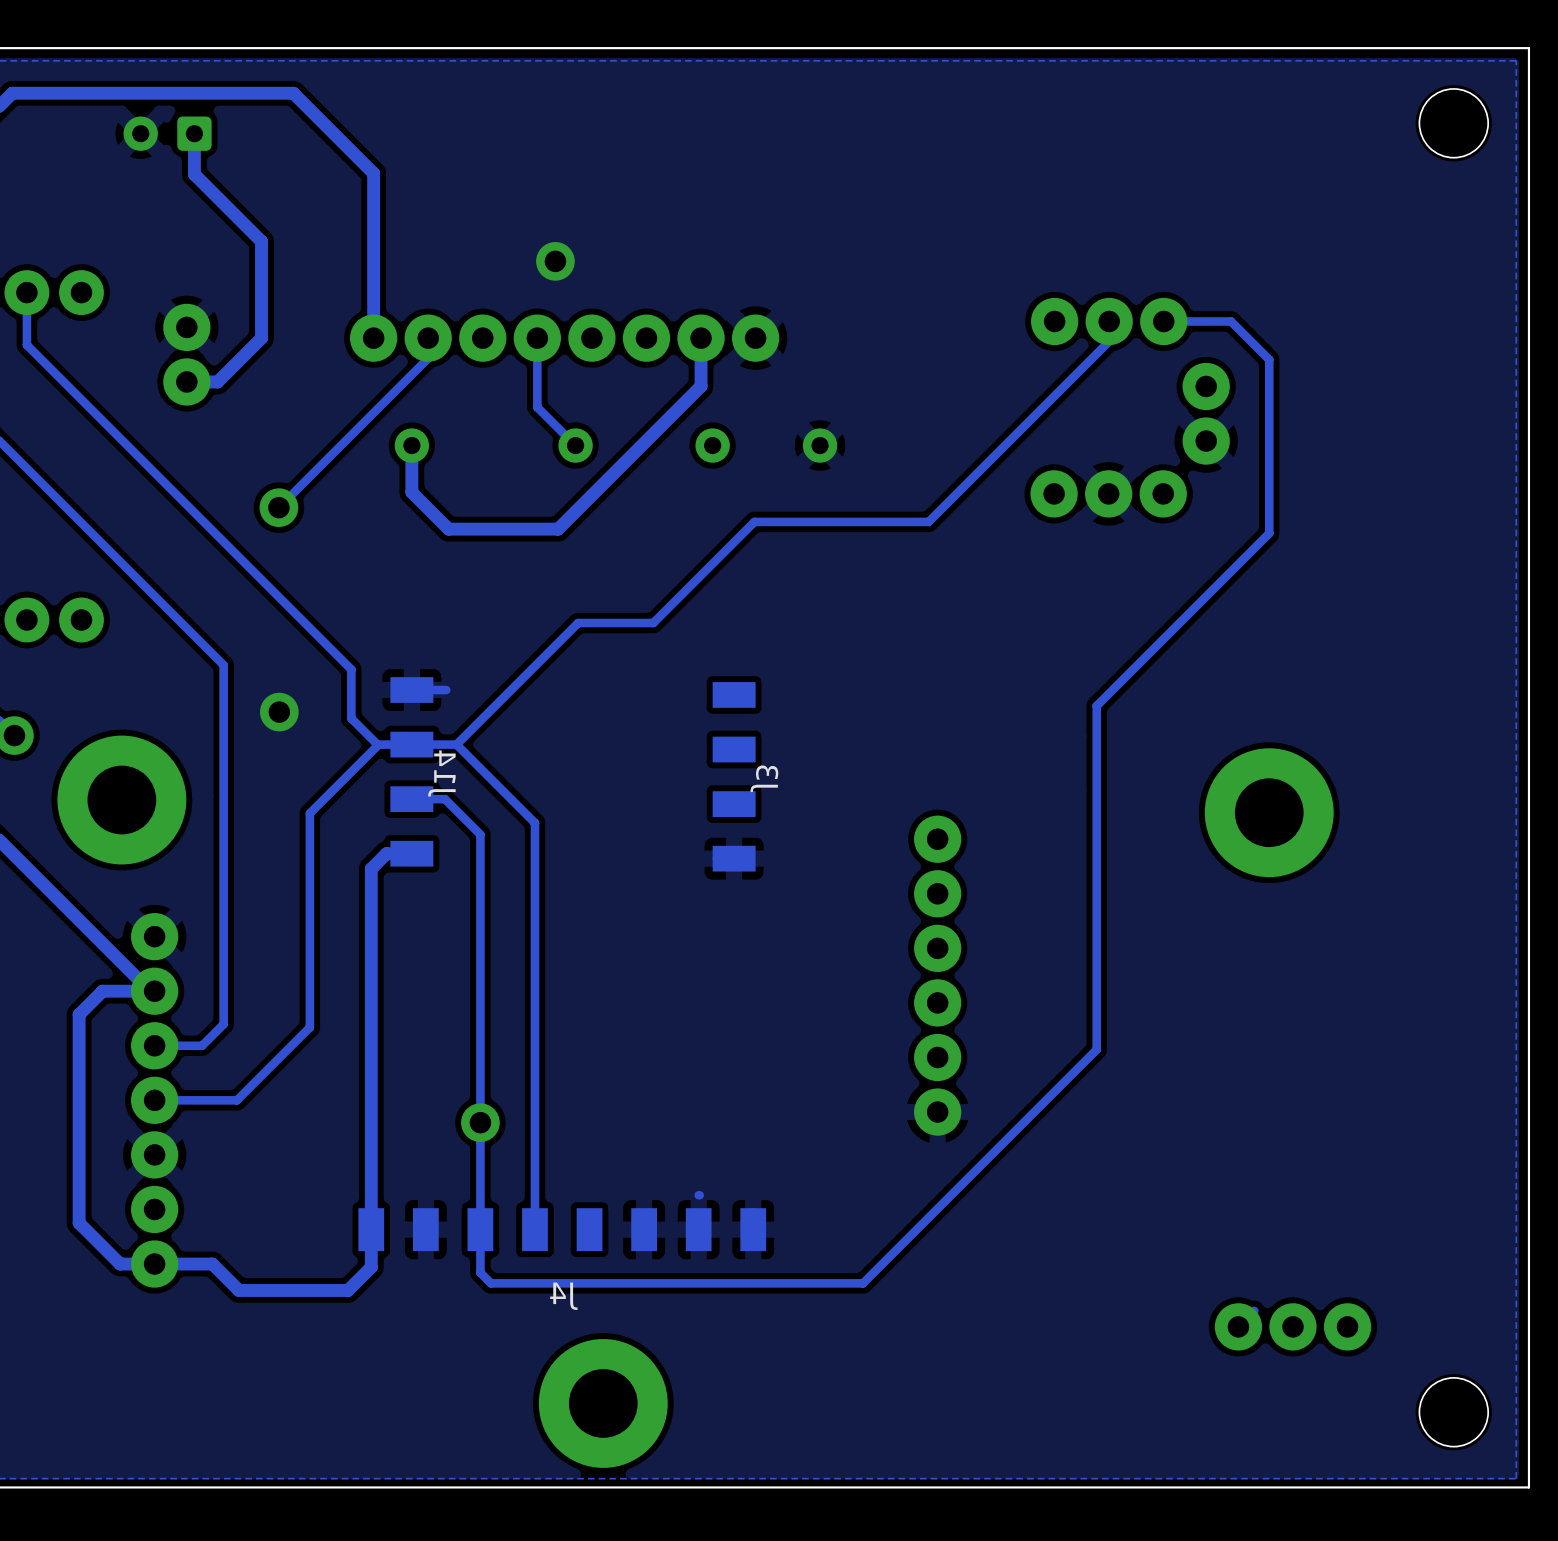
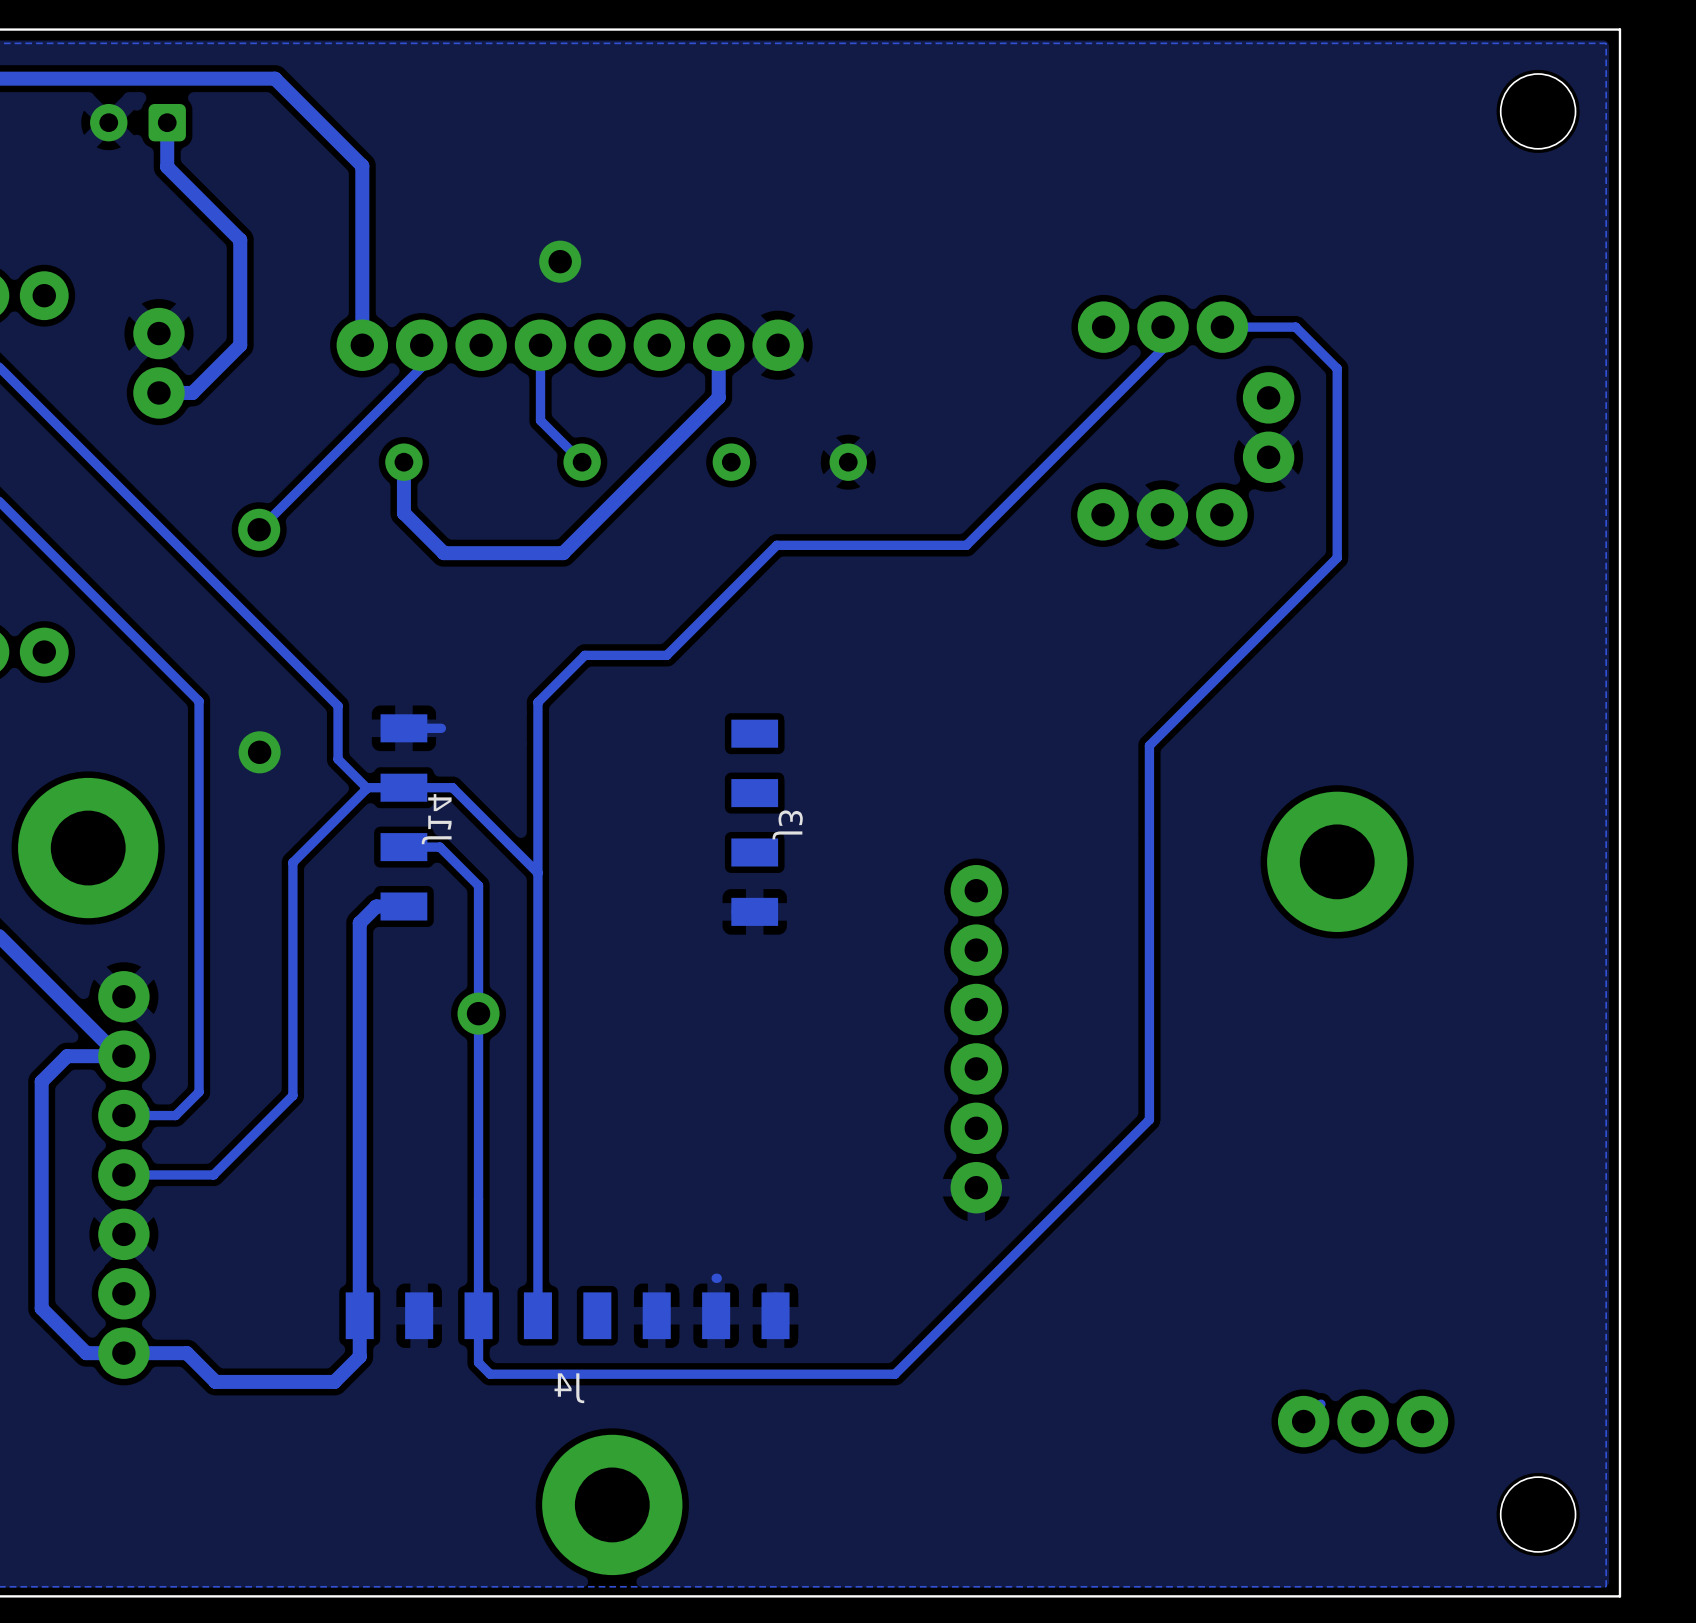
track: (534, 666) (456, 744) -> (537, 702) (537, 873)
via: none -> (478, 1013)
via: (480, 1122) -> none

